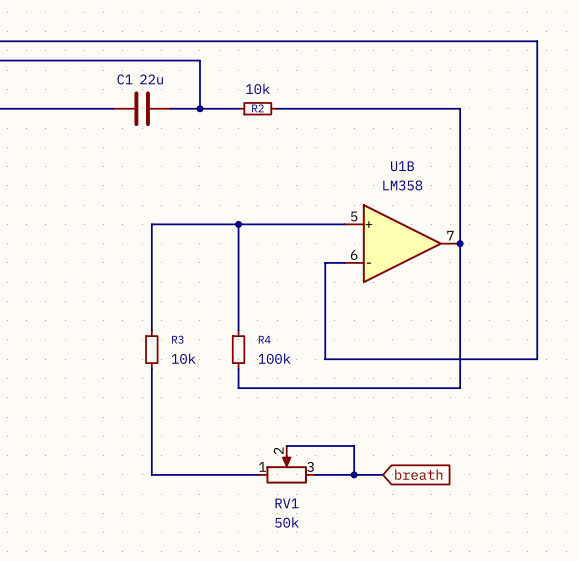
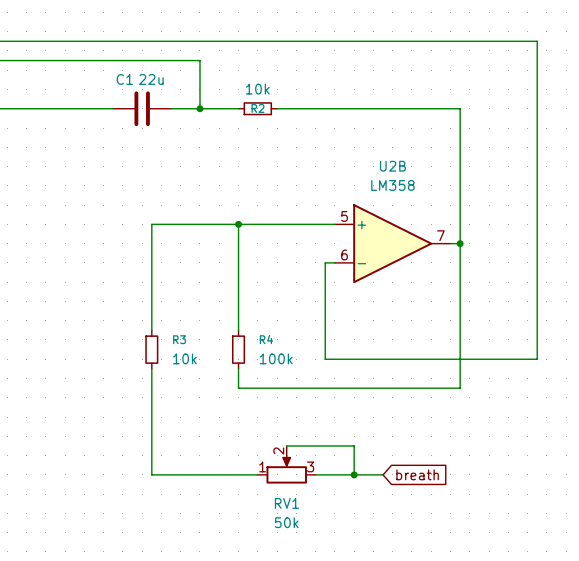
U2B: none -> LM358 (392, 243)
U1B: LM358 (402, 243) -> none

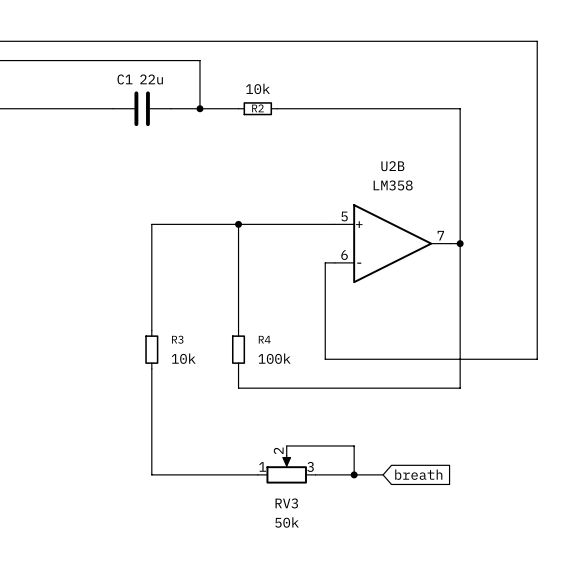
RV1 name: RV1 (286, 503) -> RV3 (286, 503)

